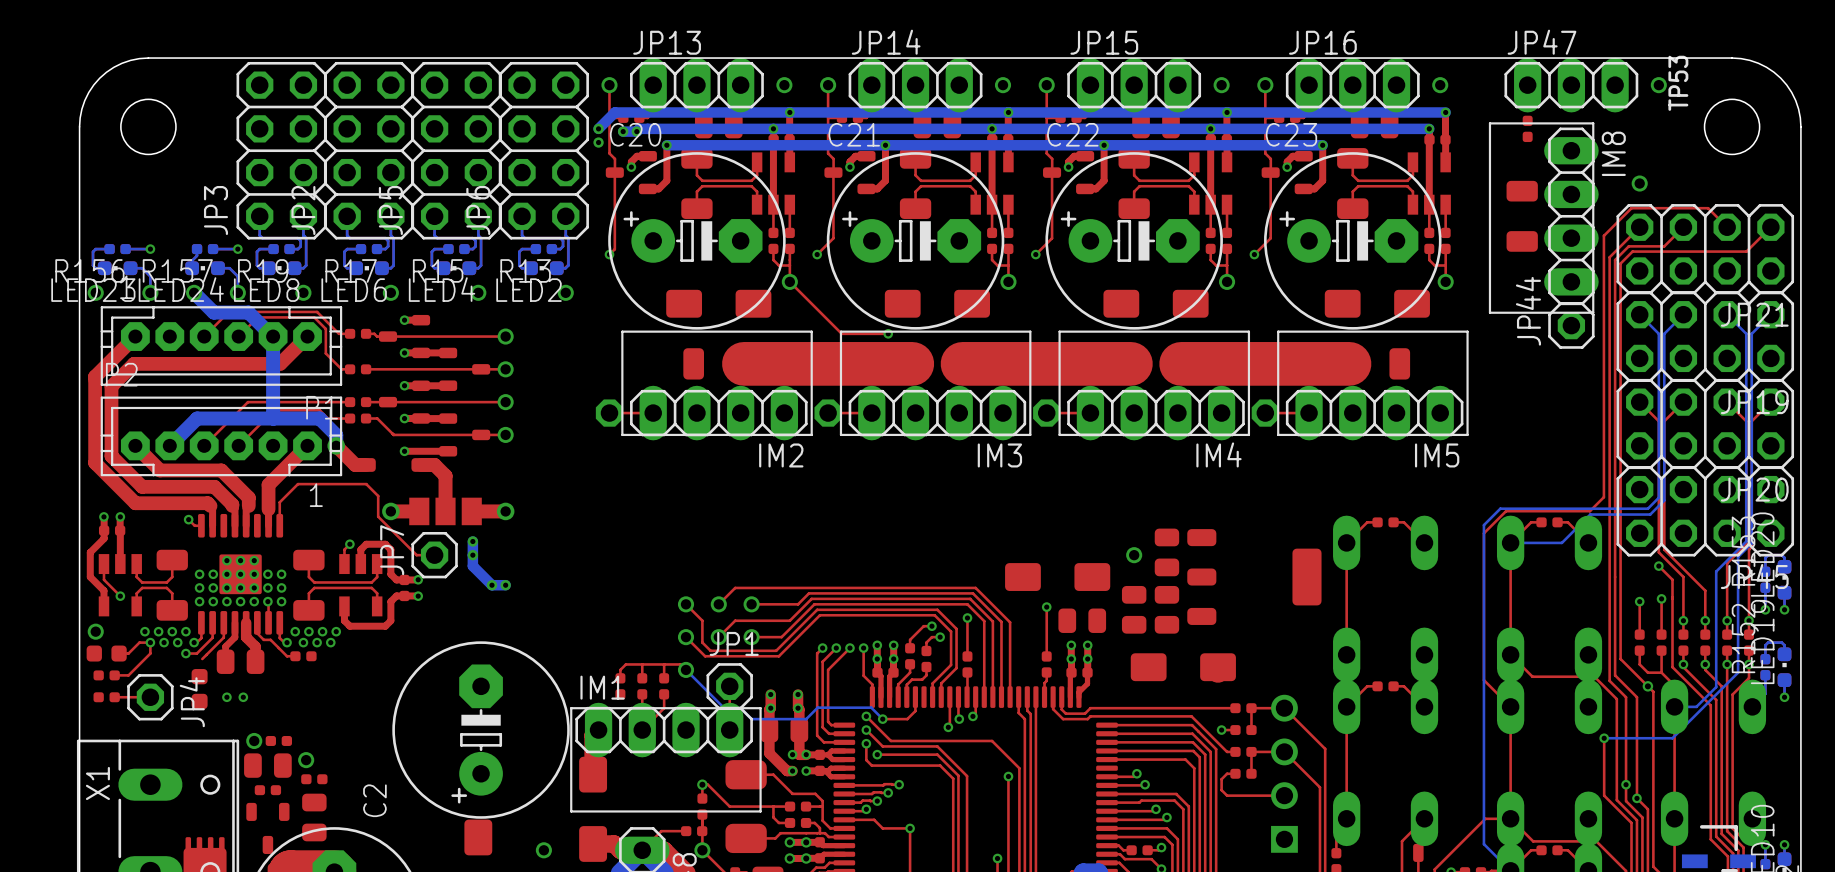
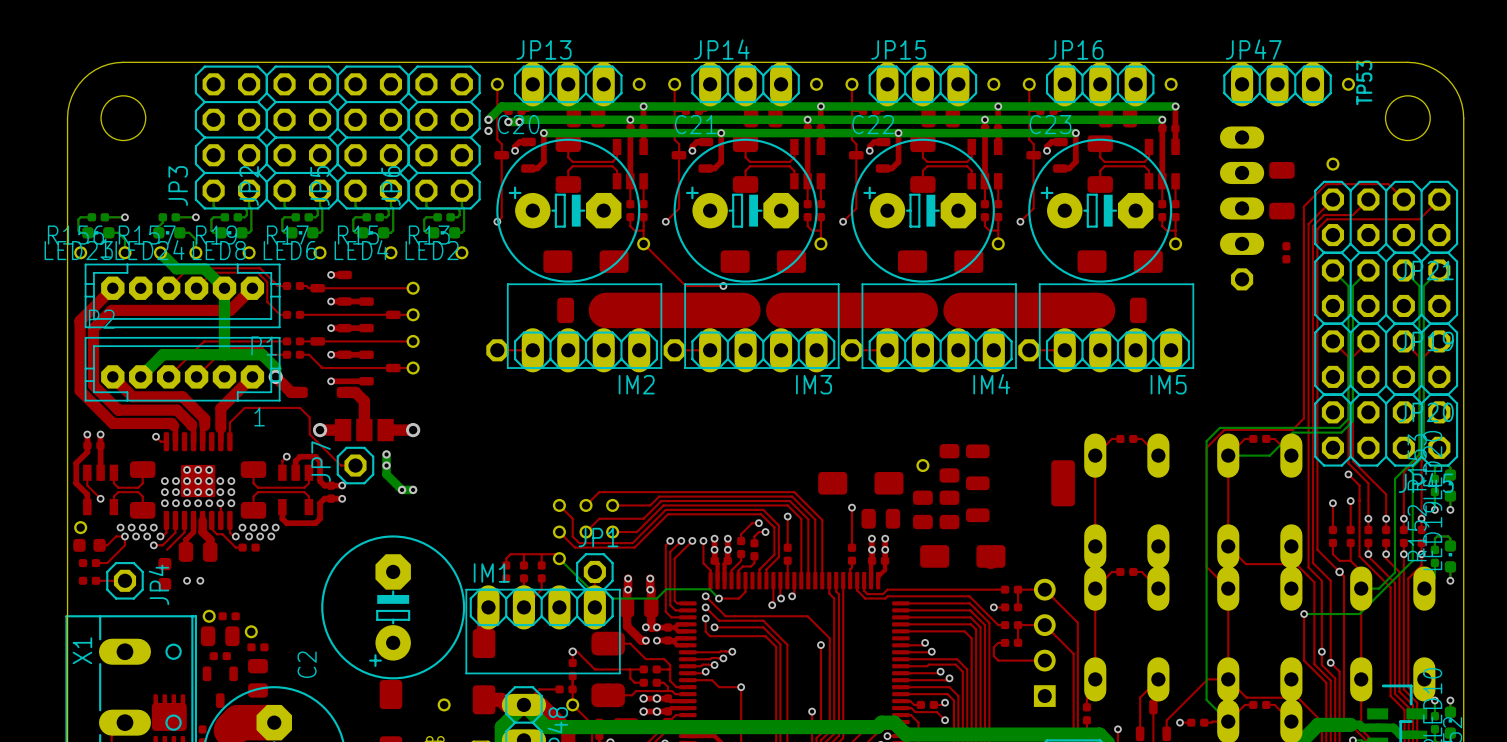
part position: (1527, 128) -> (1286, 252)
part footprint: [1506, 180, 1538, 252] -> [1219, 126, 1265, 255]
part: none -> (1281, 190)
IM8: (1543, 218) -> none
JP44 side: bottom (1571, 325) -> top (1242, 279)

